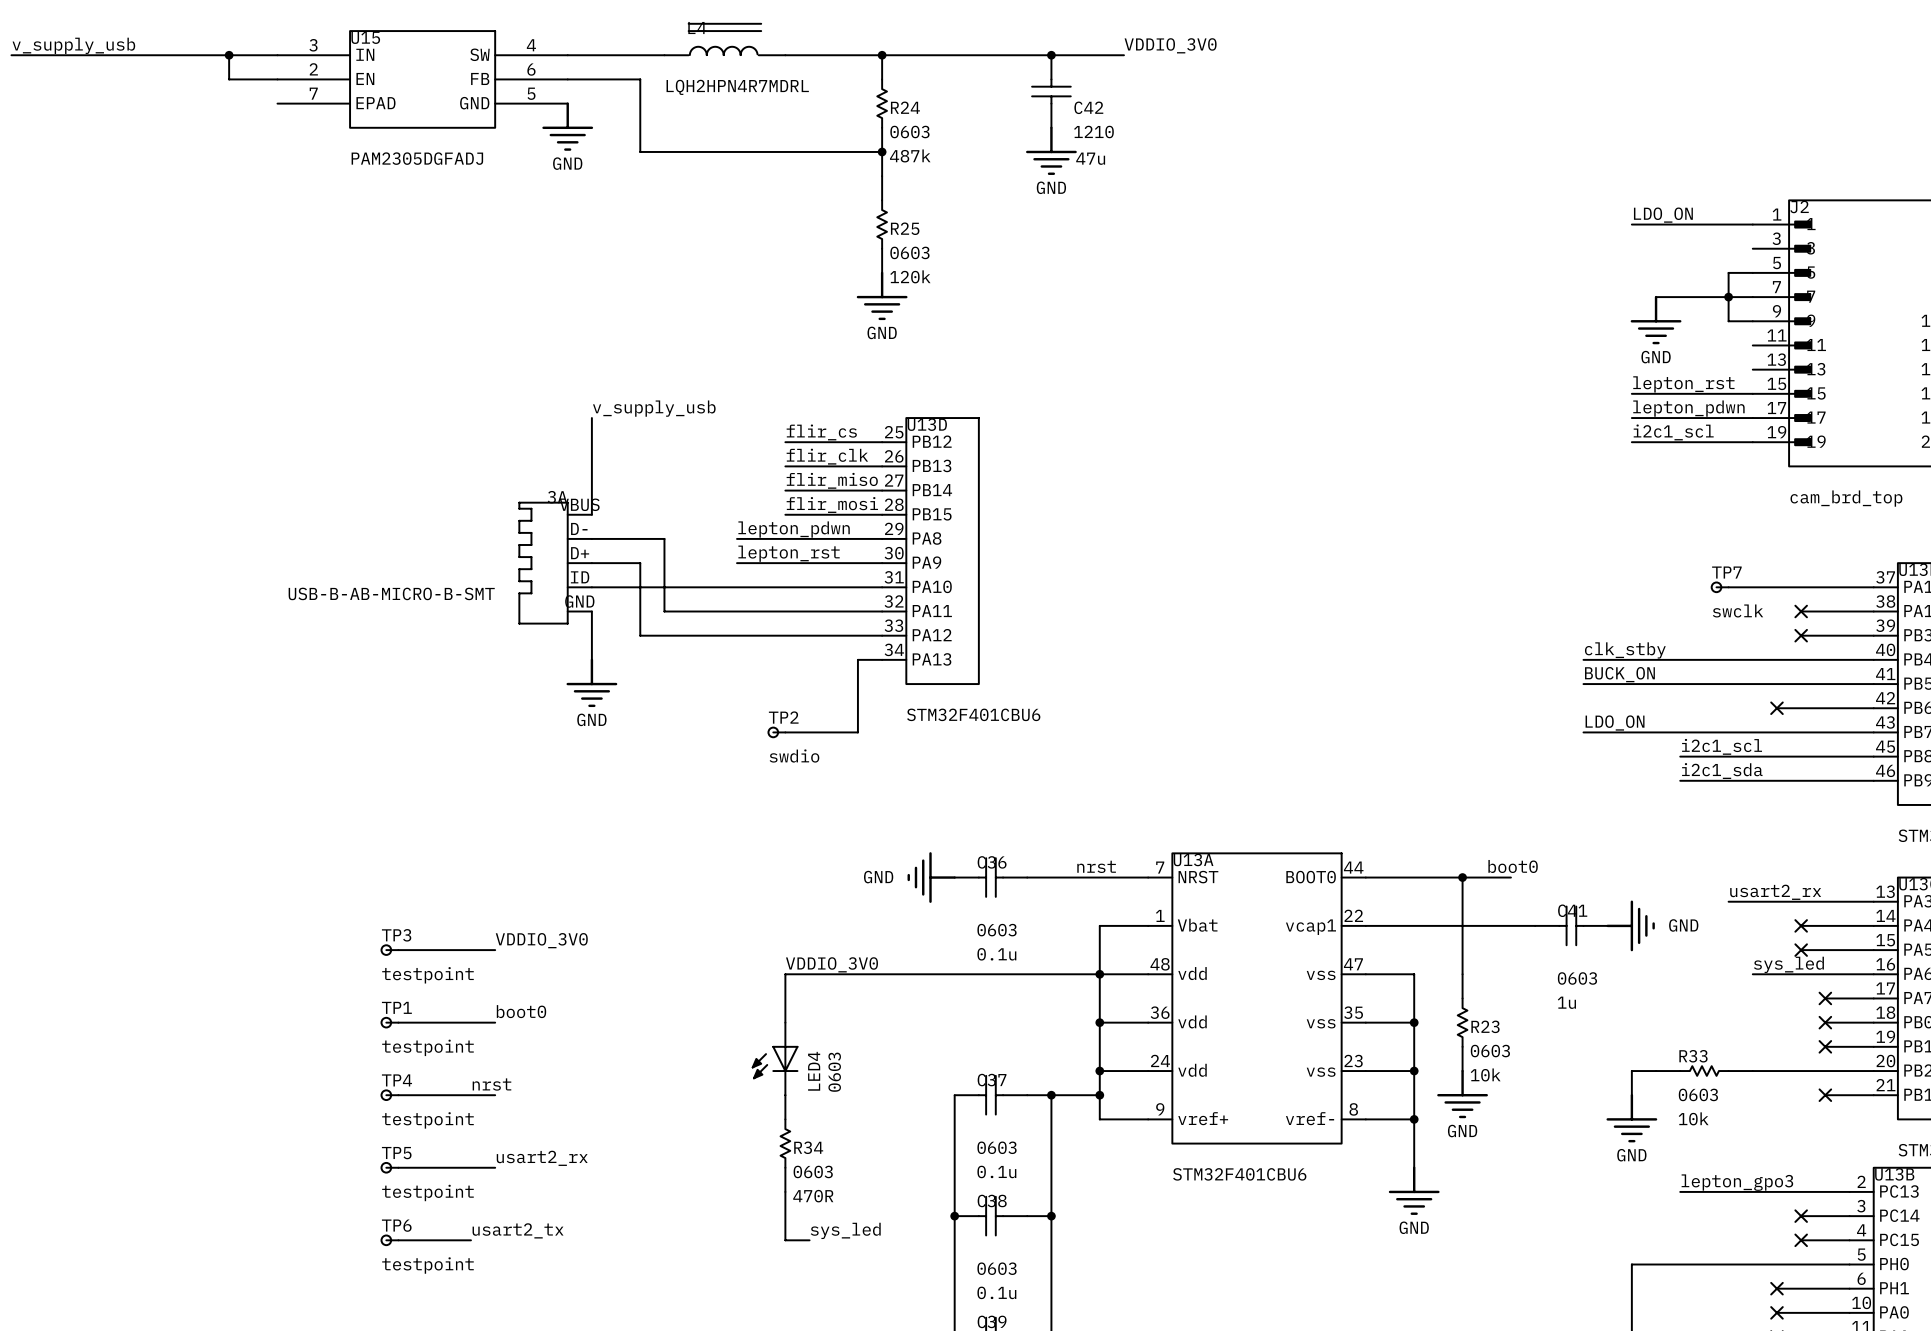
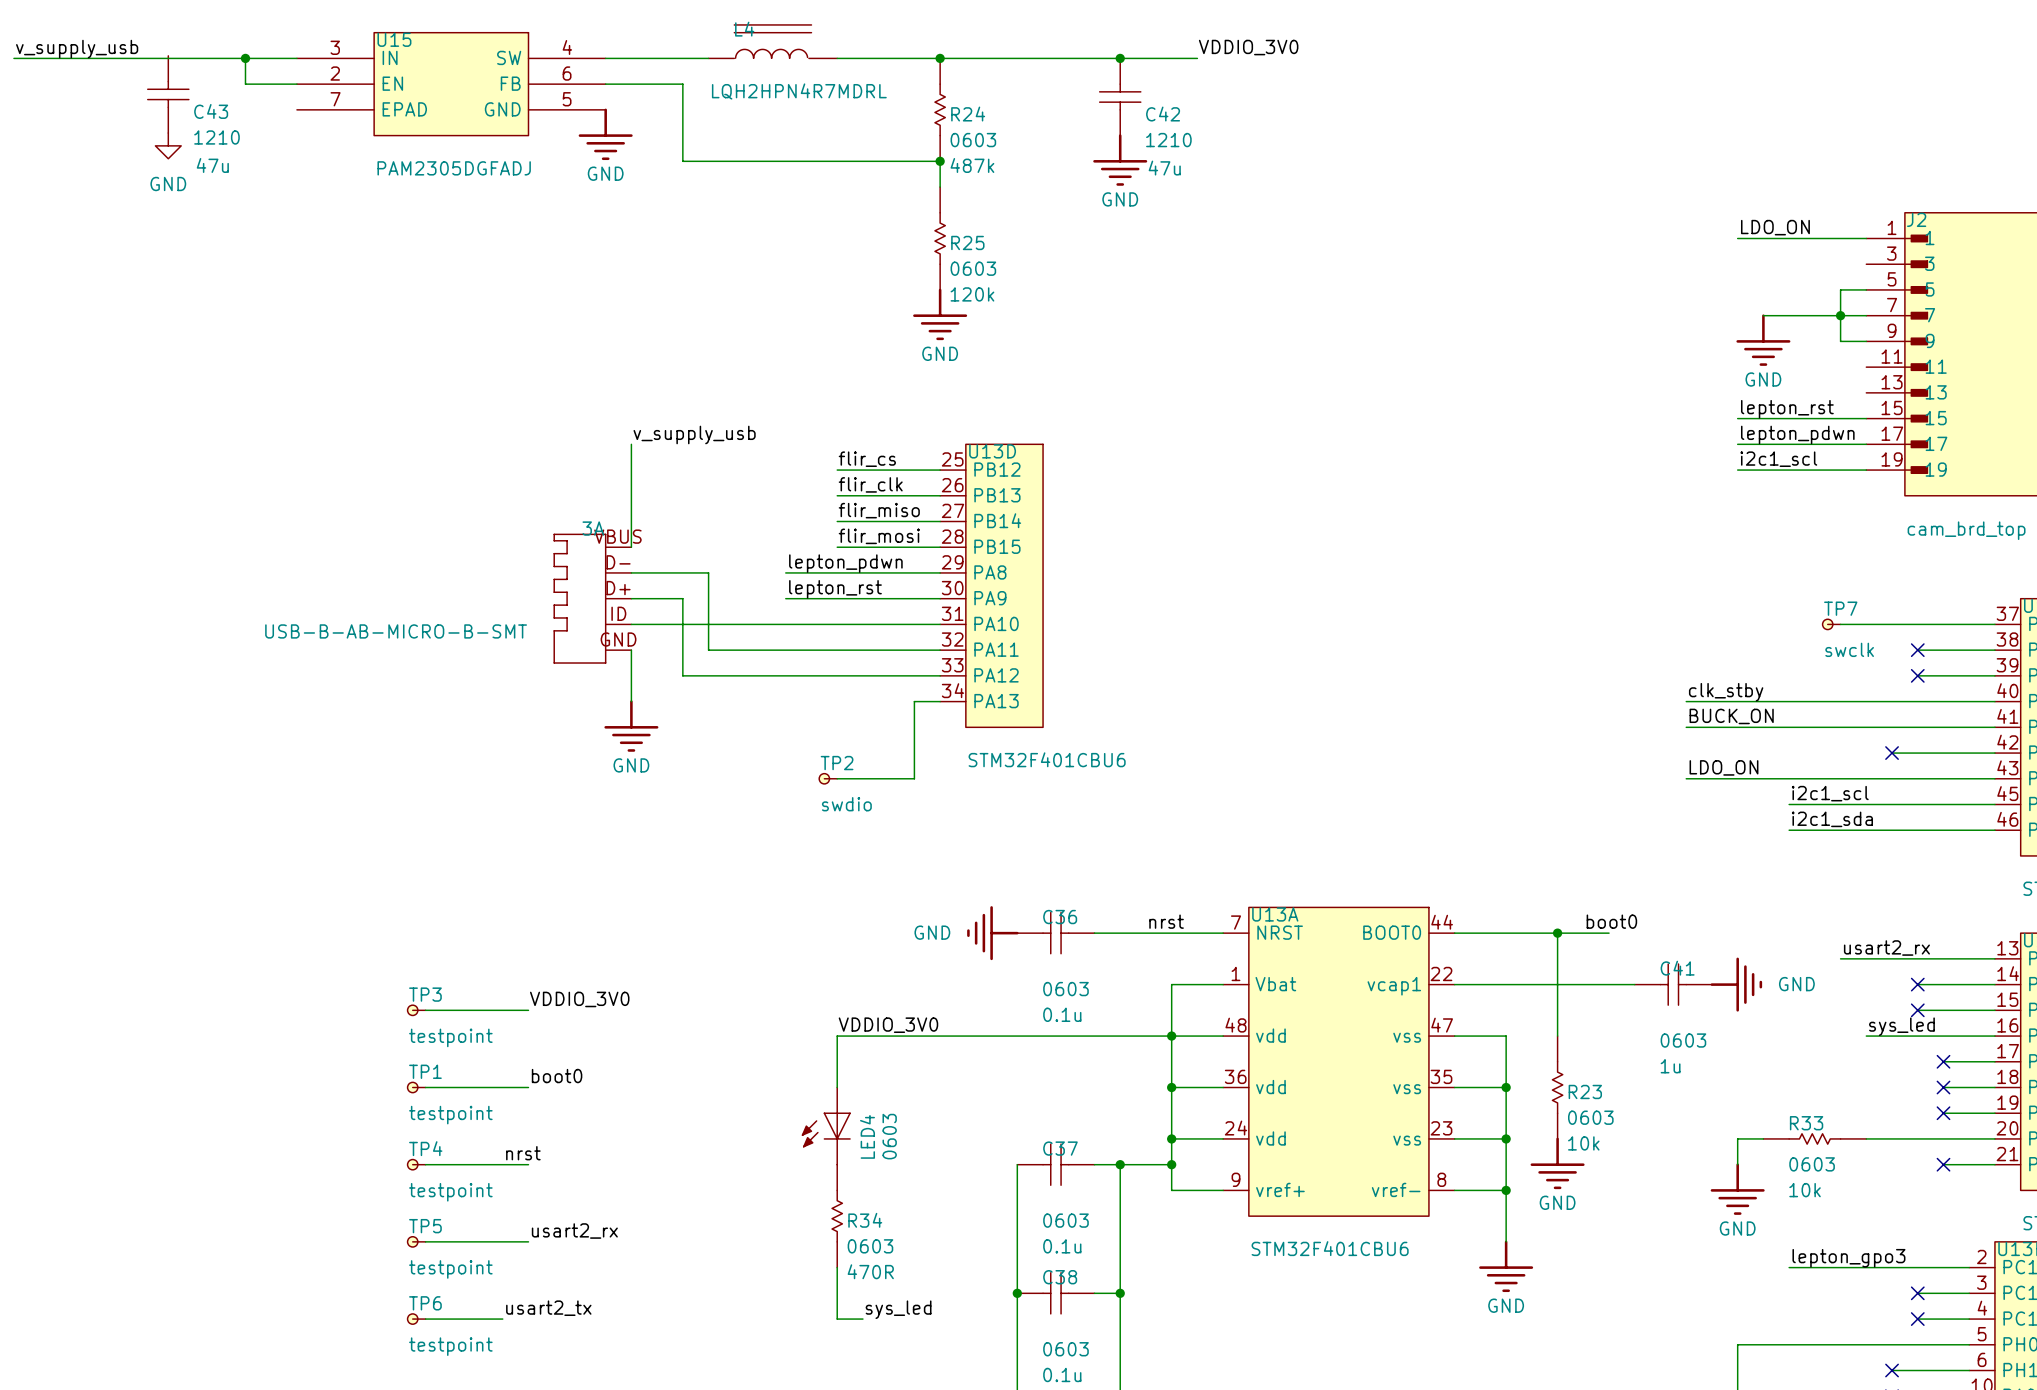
C43: none -> 1210 (168, 94)
power symbol: none -> GND (168, 145)

